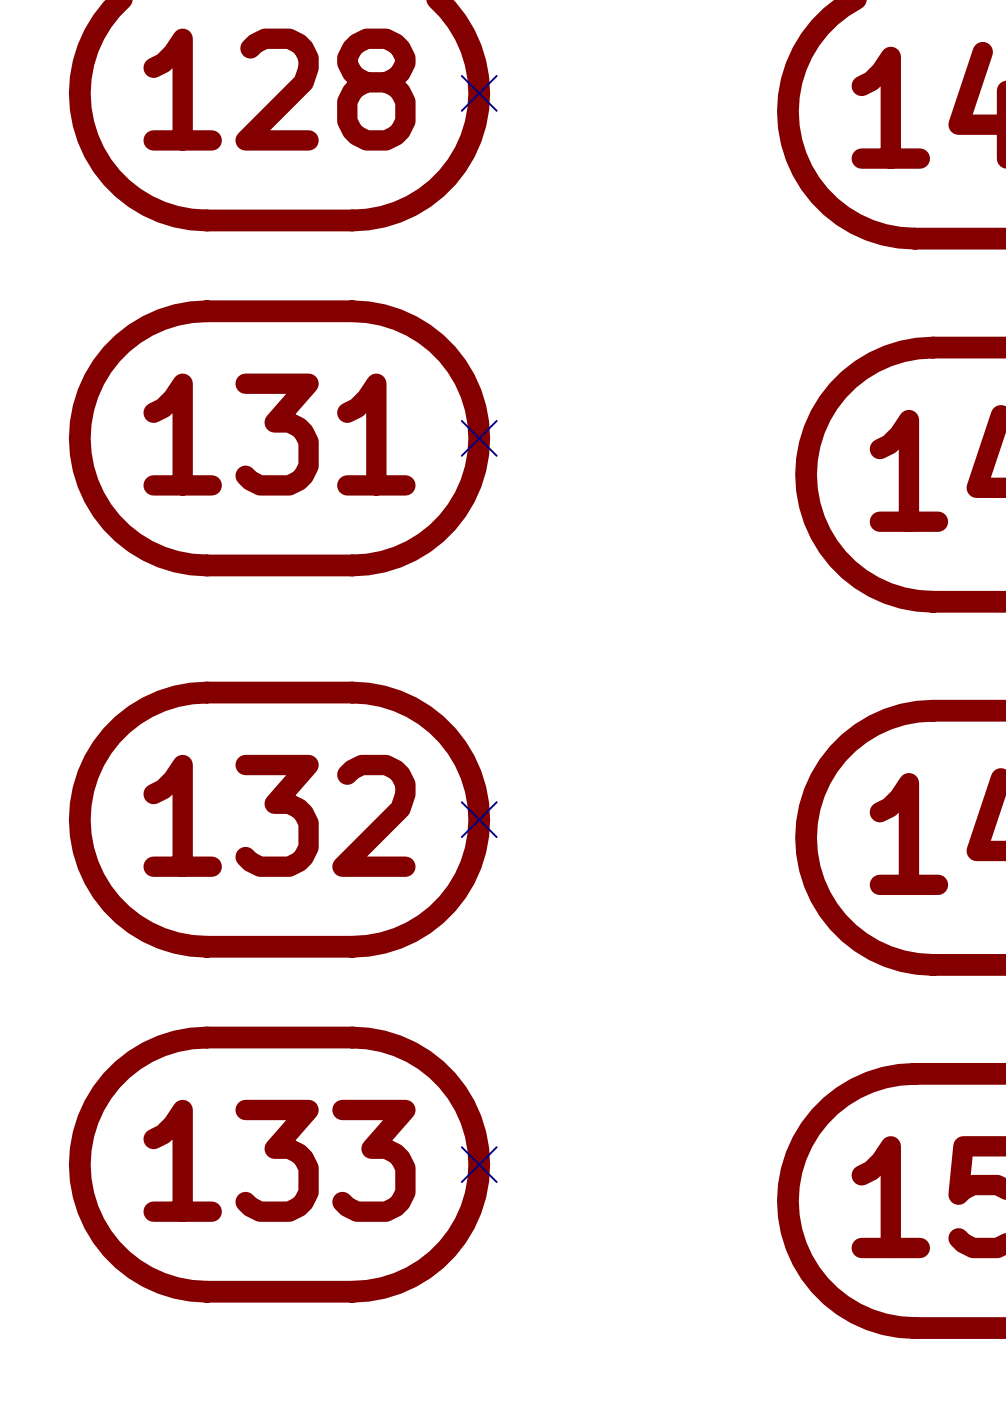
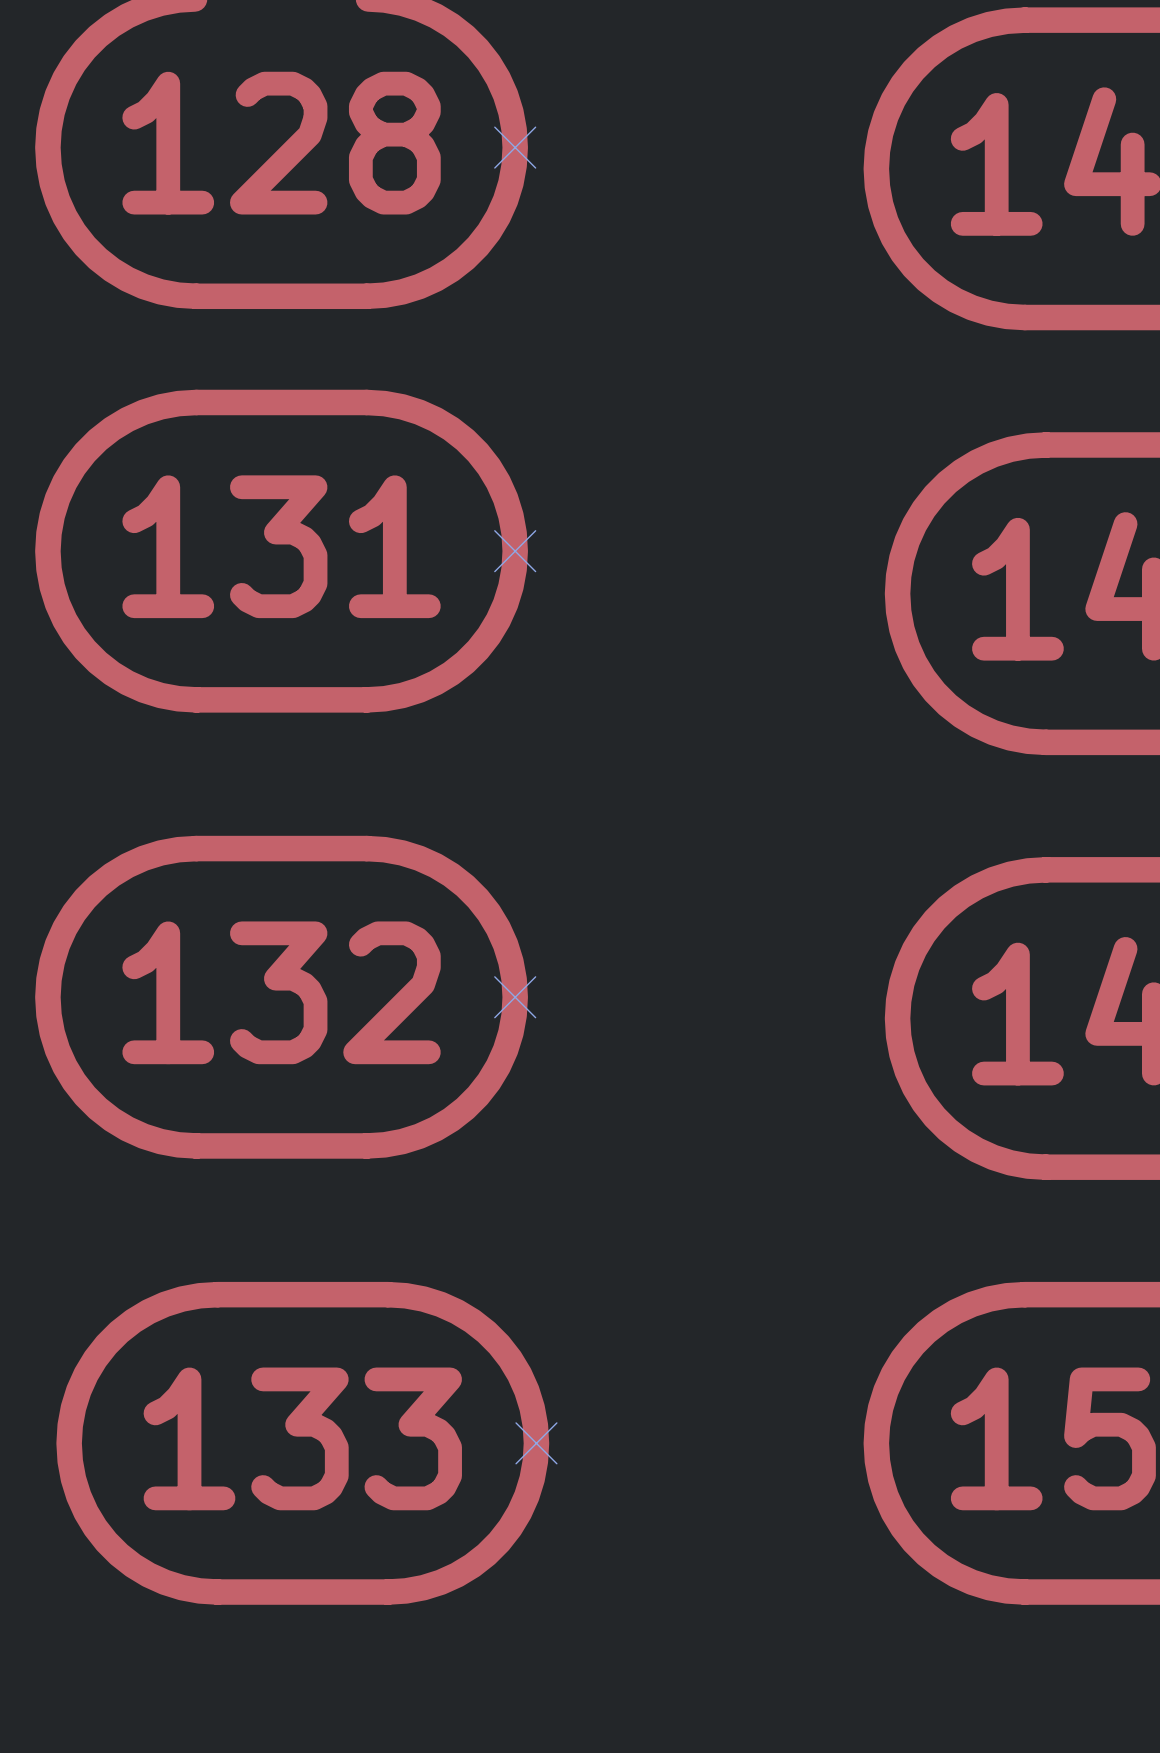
part position: (279, 1164) -> (302, 1443)
no-connect mark position: (479, 1164) -> (536, 1443)

